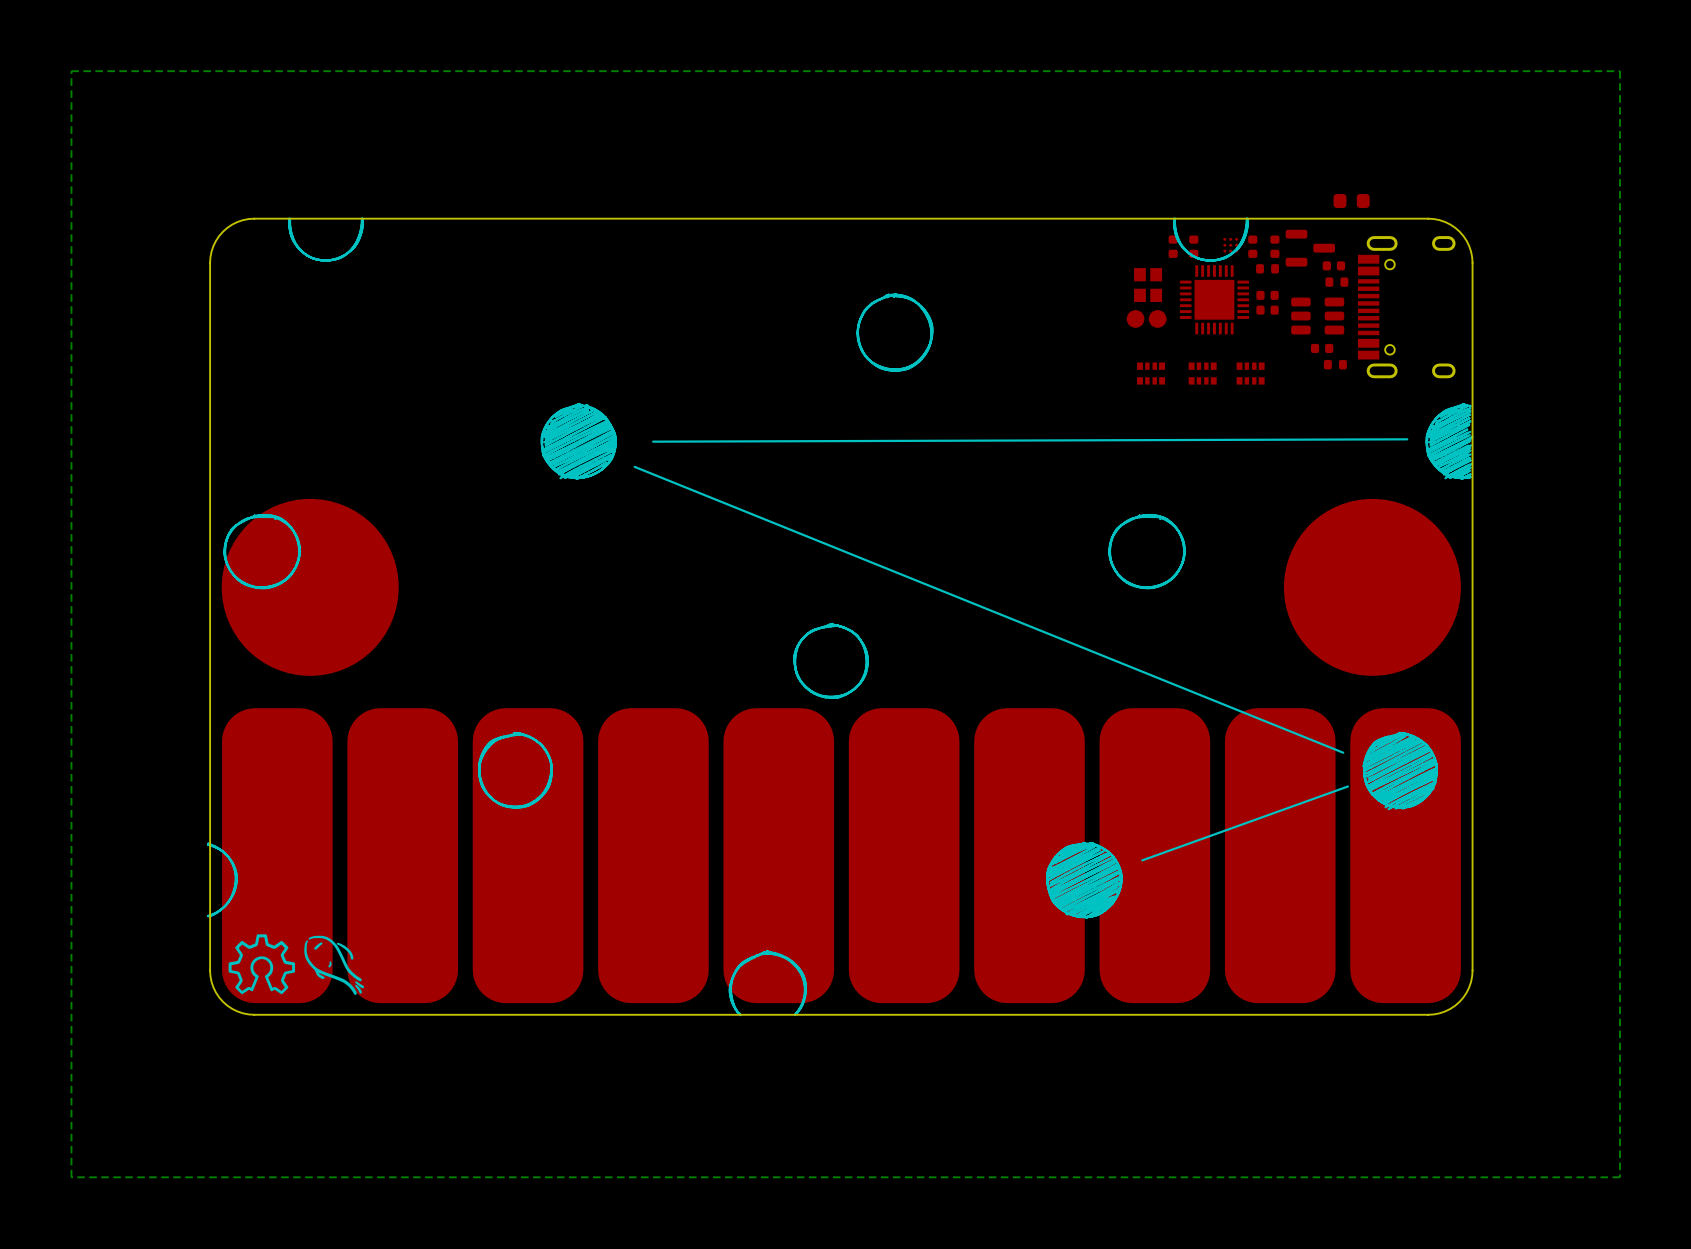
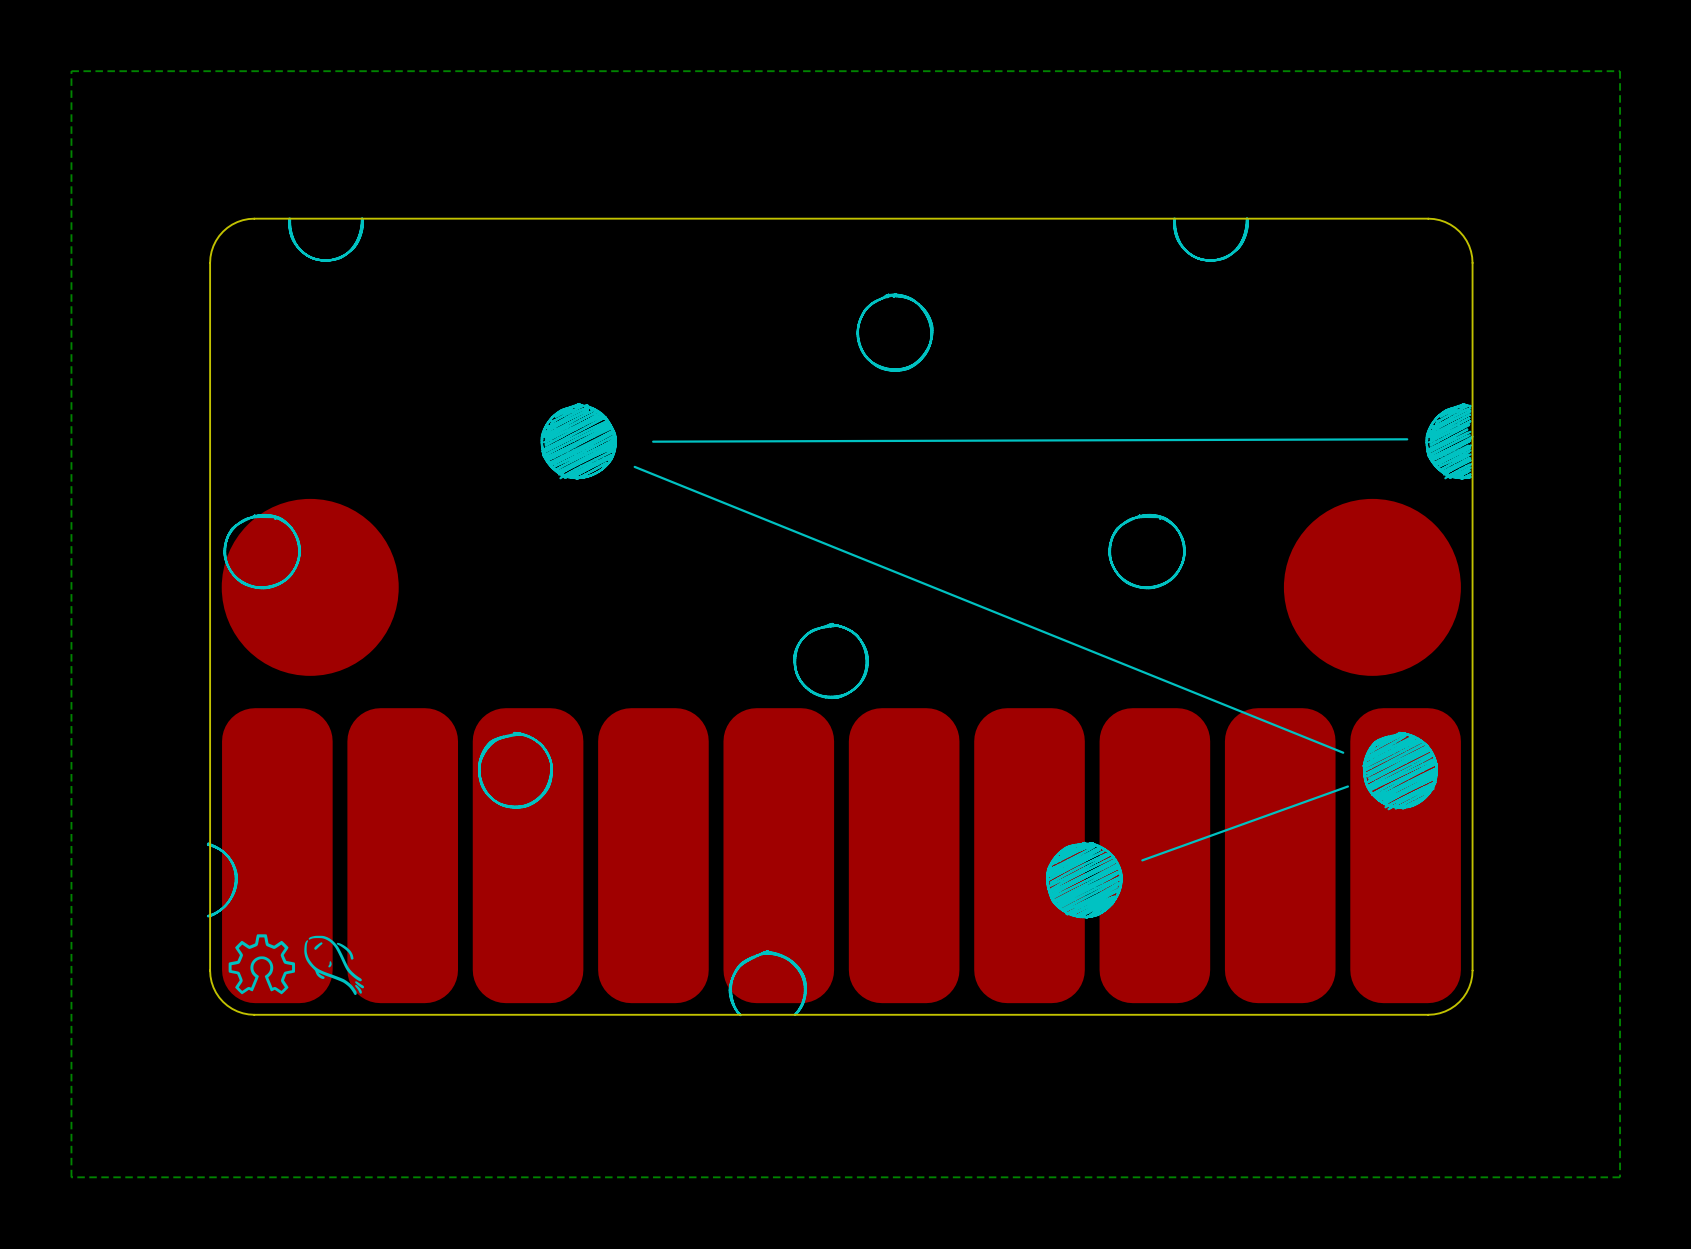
part: (1351, 200) -> none
part: (1230, 245) -> none
part: (1173, 246) -> none
part: (1193, 246) -> none
part: (1252, 246) -> none
part: (1274, 246) -> none
part: (1310, 248) -> none
part: (1333, 265) -> none
part: (1267, 268) -> none
part: (1336, 282) -> none
part: (1148, 285) -> none
part: (1267, 295) -> none
part: (1214, 299) -> none
part: (1406, 307) -> none
part: (1267, 310) -> none
part: (1317, 316) -> none
part: (1146, 318) -> none
part: (1322, 348) -> none
part: (1335, 364) -> none
part: (1151, 373) -> none
part: (1202, 373) -> none
part: (1250, 373) -> none

